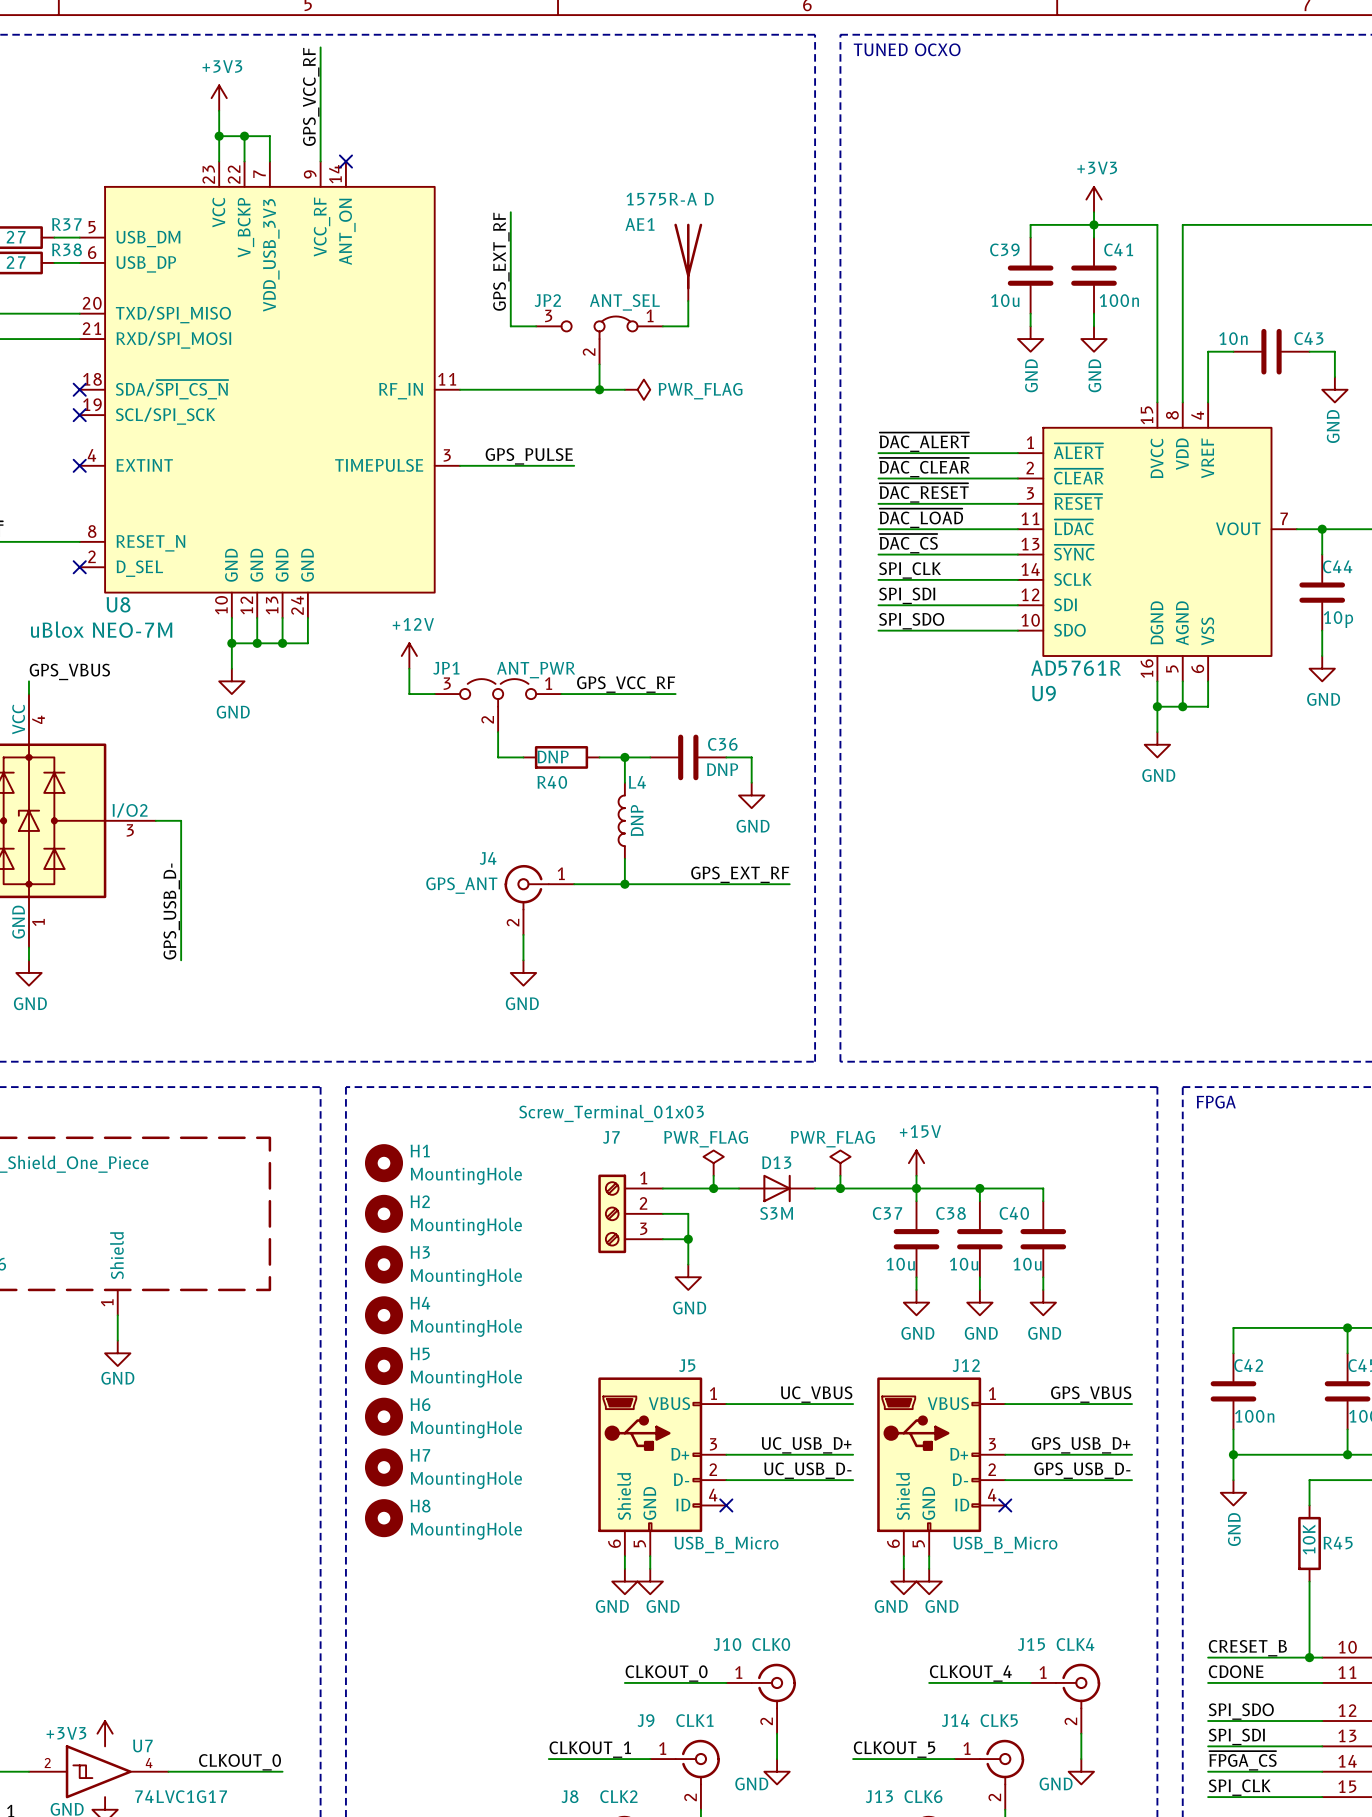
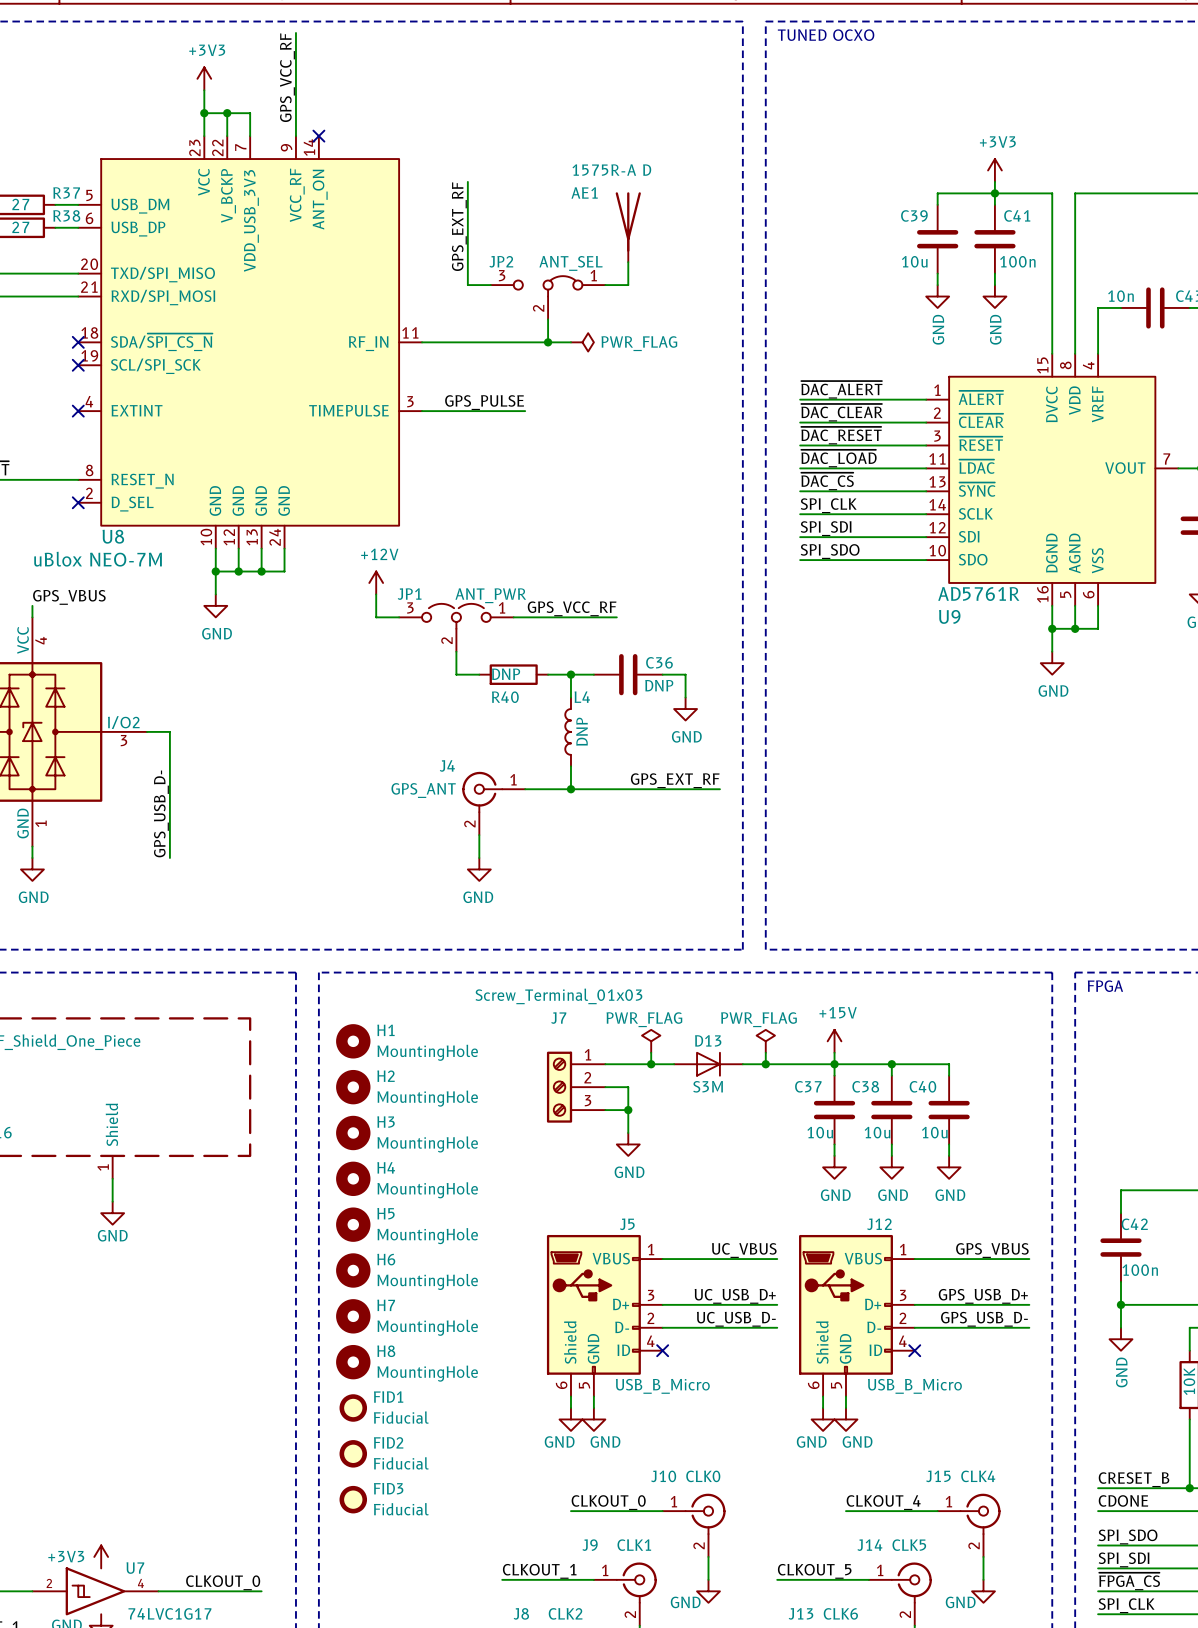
FID1: none -> Fiducial (353, 1407)
FID2: none -> Fiducial (353, 1453)
FID3: none -> Fiducial (353, 1499)

